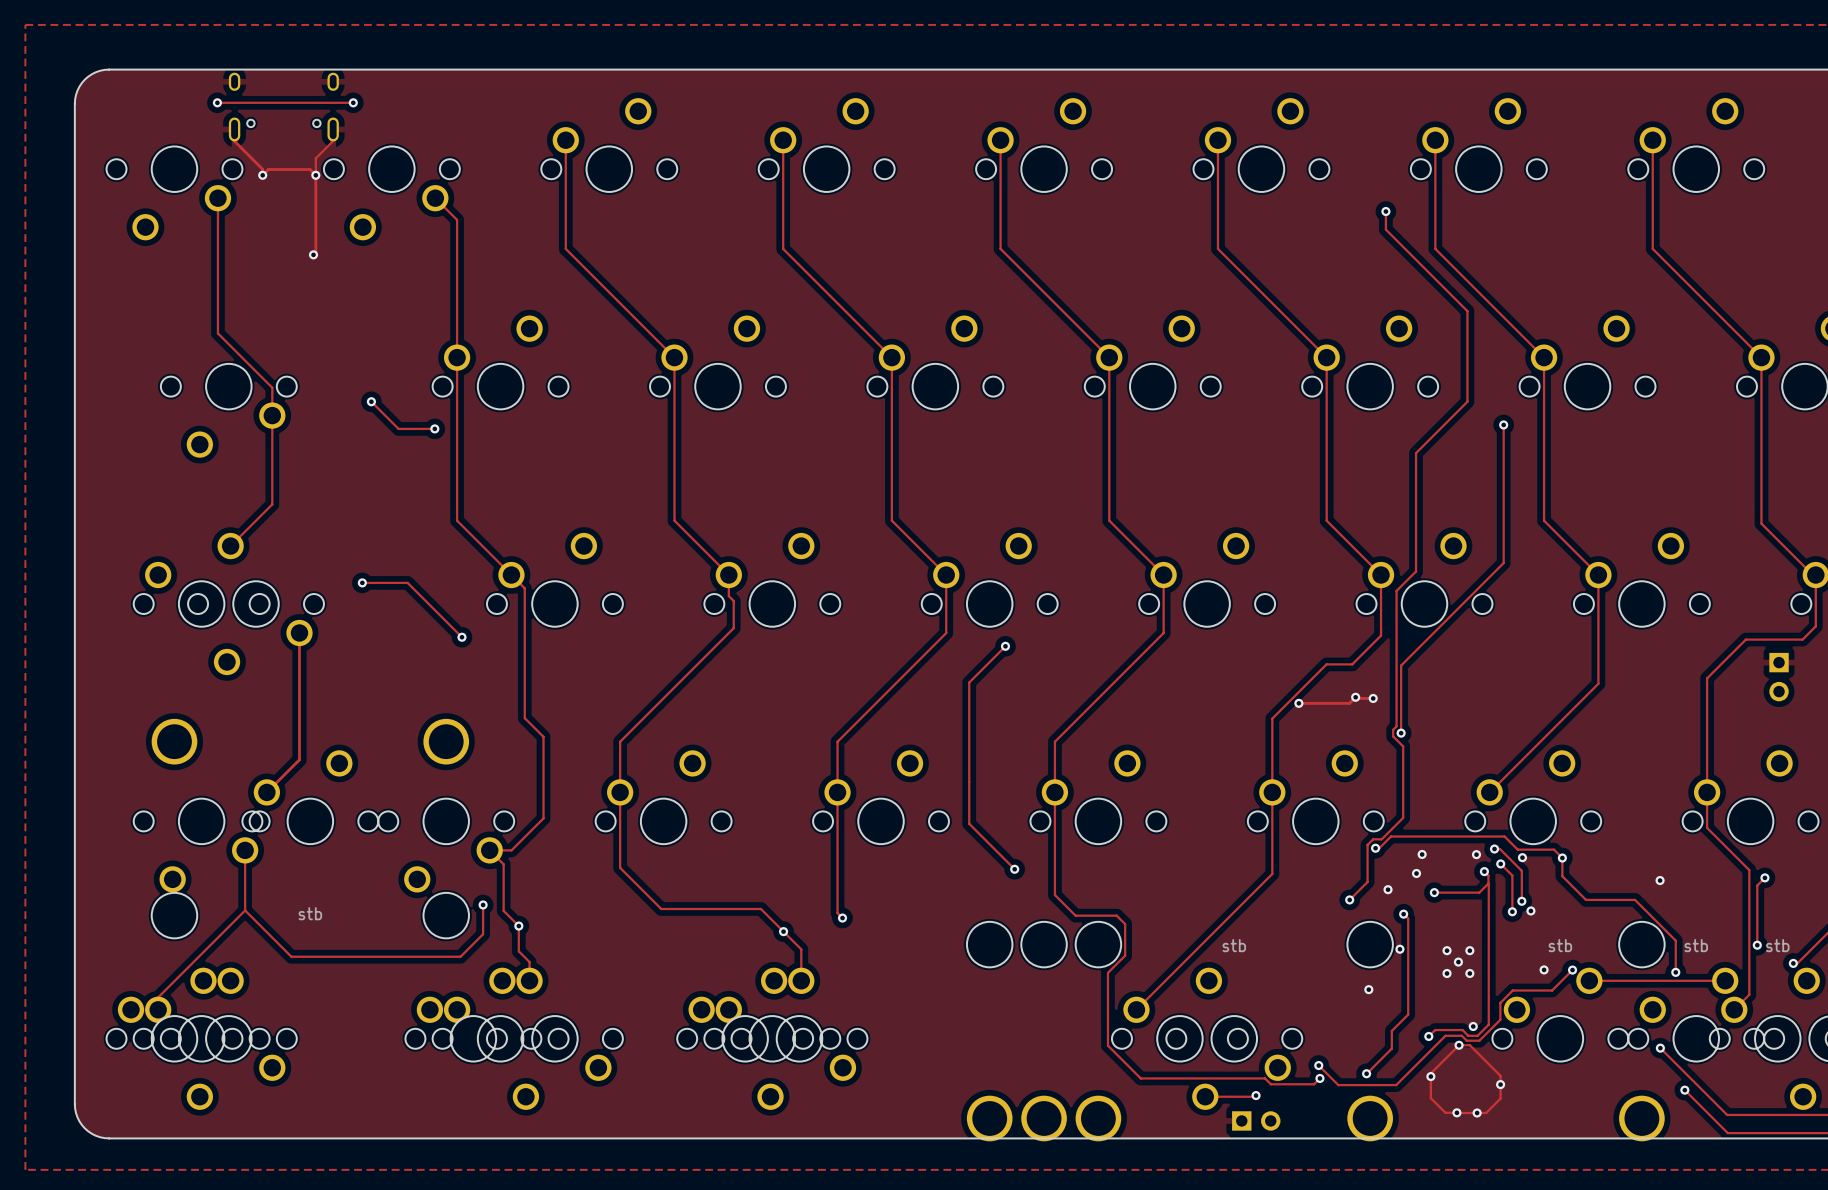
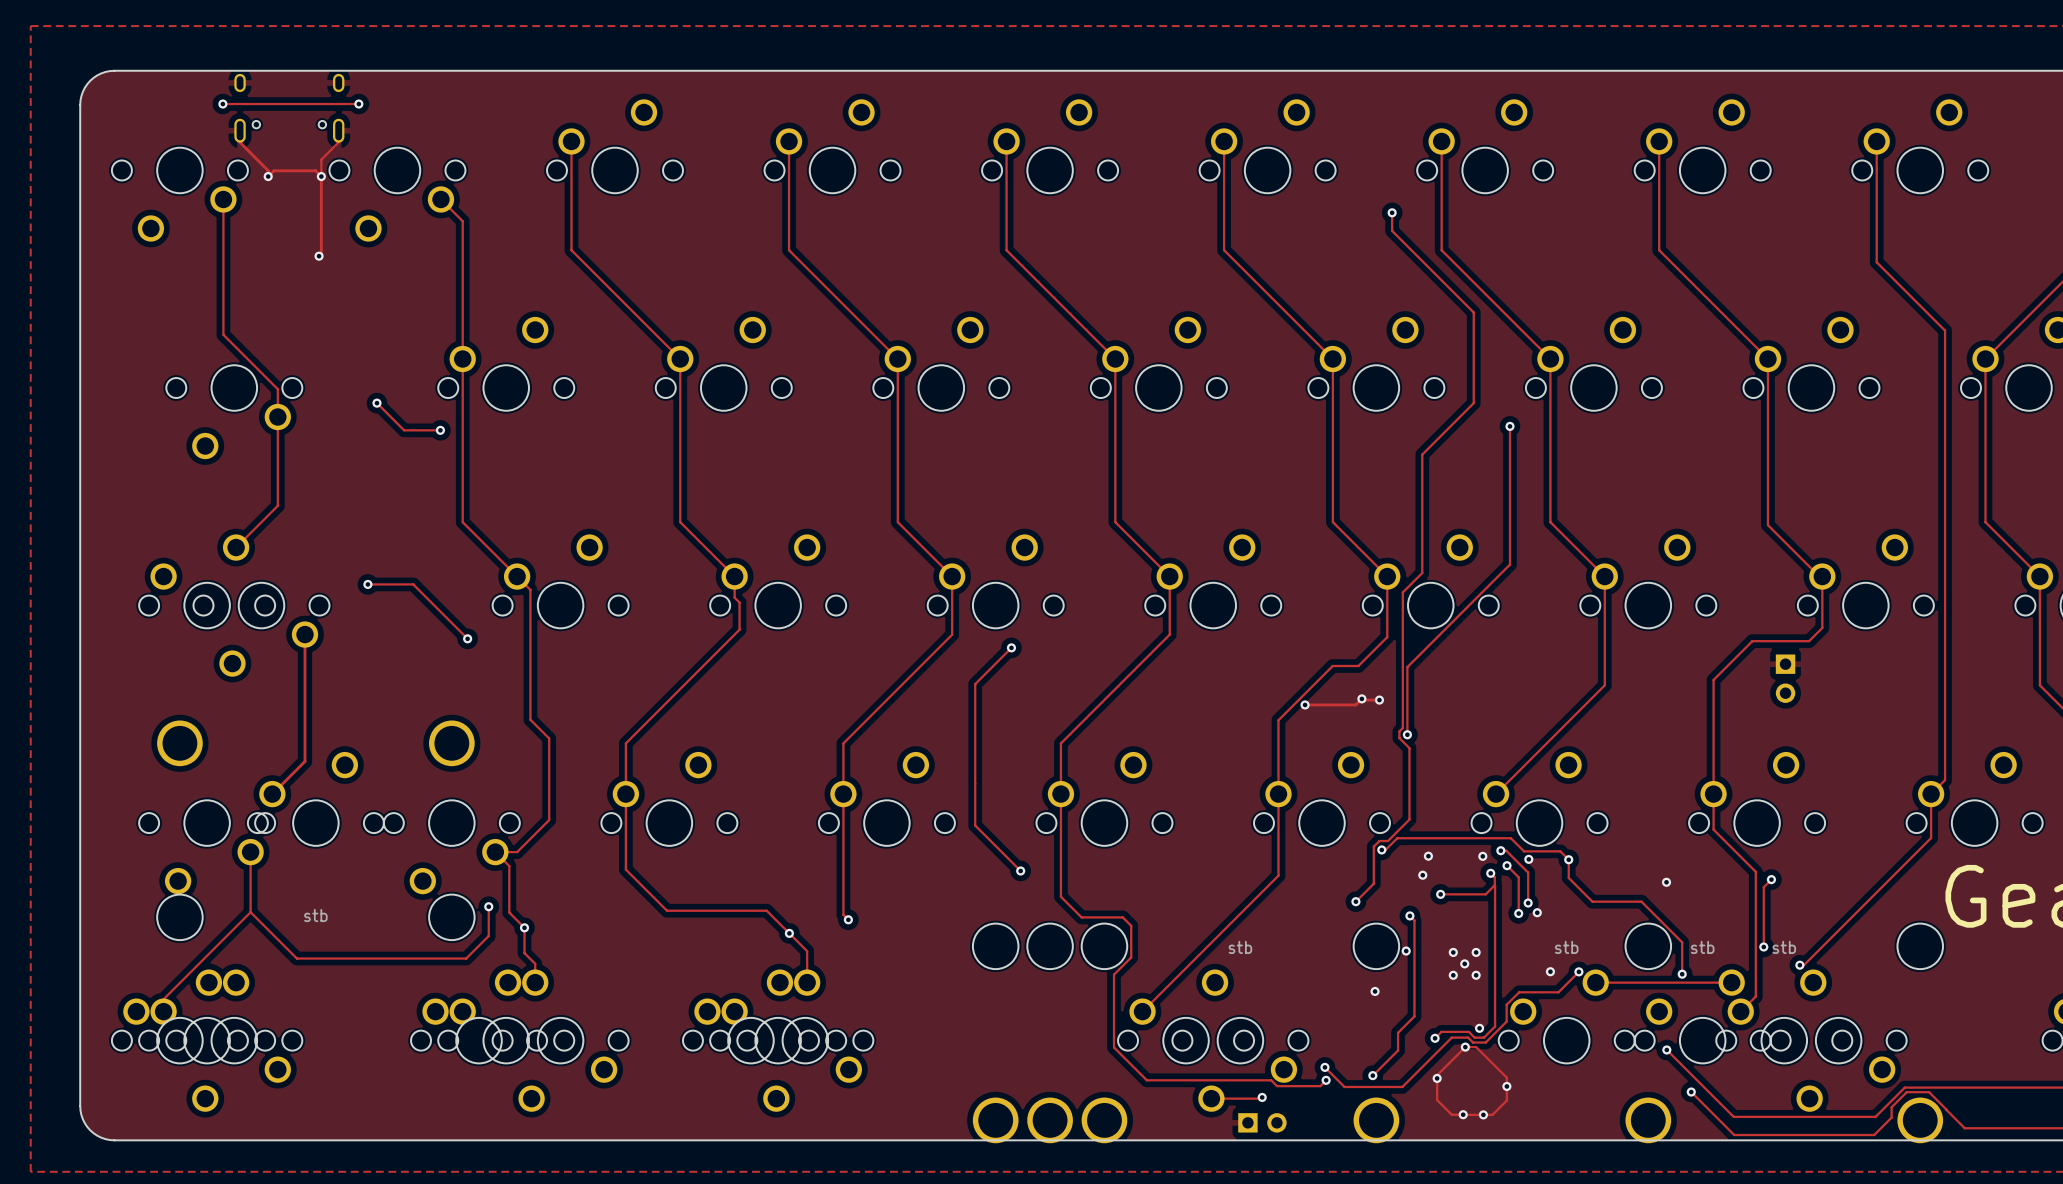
via: (1388, 889) -> none

